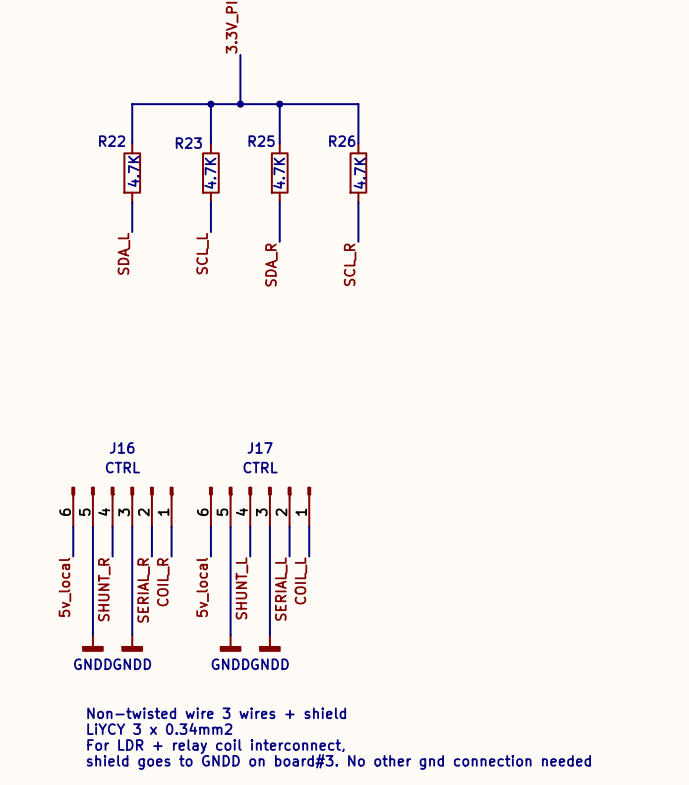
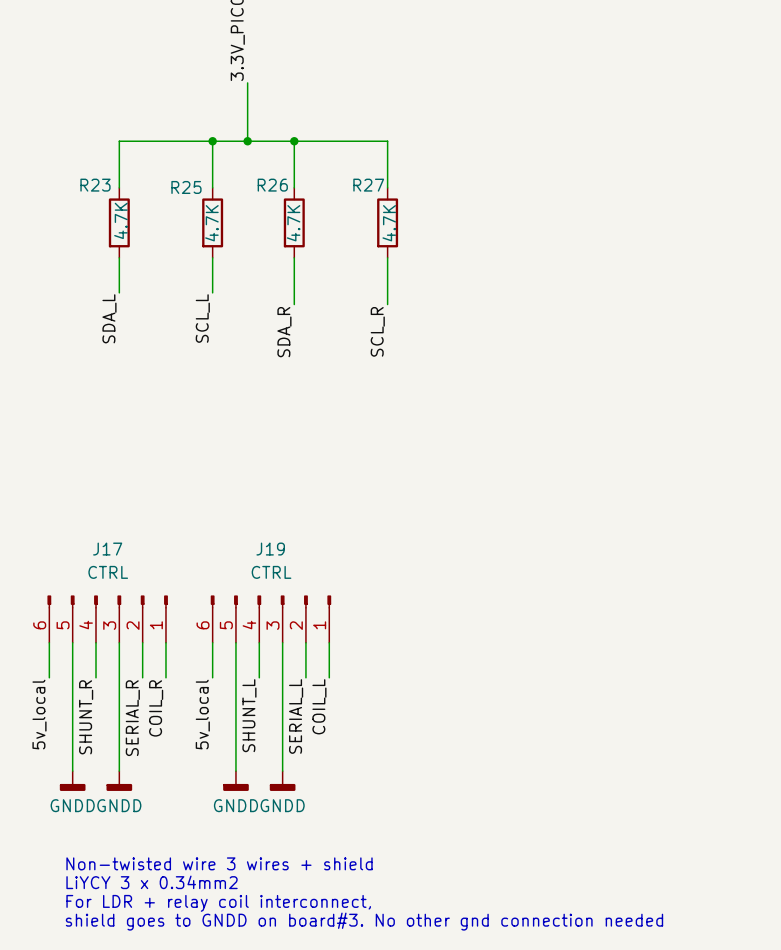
R22 name: R22 (112, 141) -> R23 (95, 185)
R25 name: R25 (261, 141) -> R26 (272, 185)
R26 name: R26 (342, 141) -> R27 (368, 185)
R23 name: R23 (188, 143) -> R25 (186, 187)
J16 name: J16 (122, 447) -> J17 (107, 549)
J17 name: J17 (260, 447) -> J19 (270, 549)

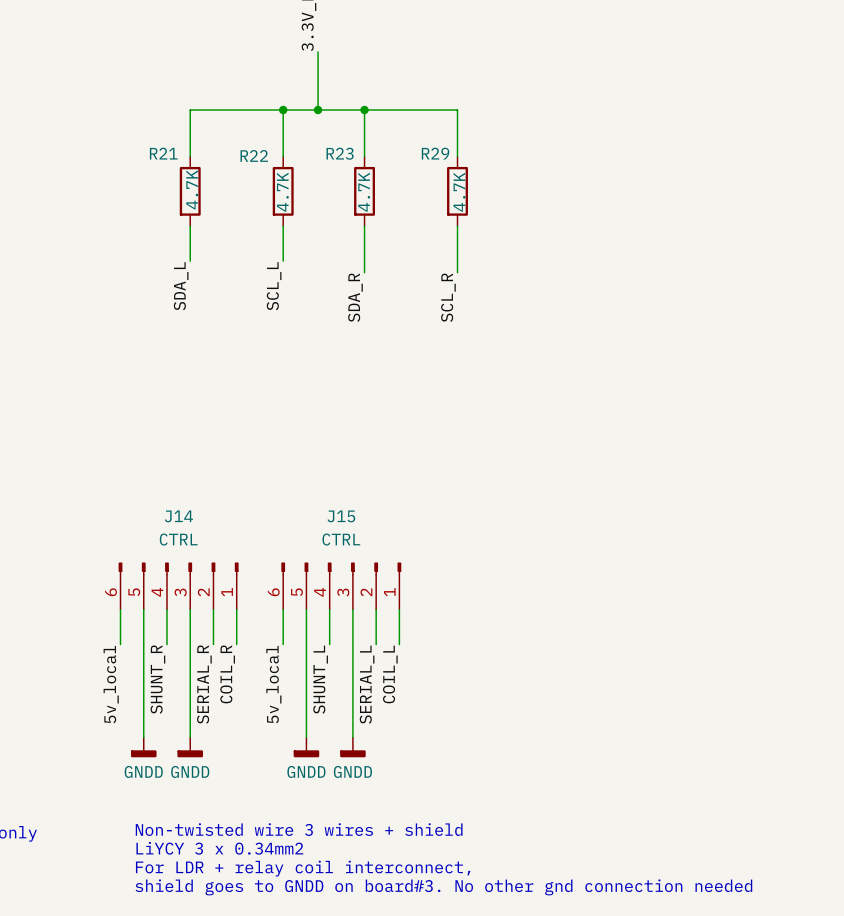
R23 name: R23 (95, 185) -> R21 (163, 153)
R26 name: R26 (272, 185) -> R23 (340, 153)
R27 name: R27 (368, 185) -> R29 (435, 153)
R25 name: R25 (186, 187) -> R22 (254, 155)
J17 name: J17 (107, 549) -> J14 (178, 516)
J19 name: J19 (270, 549) -> J15 (341, 516)

